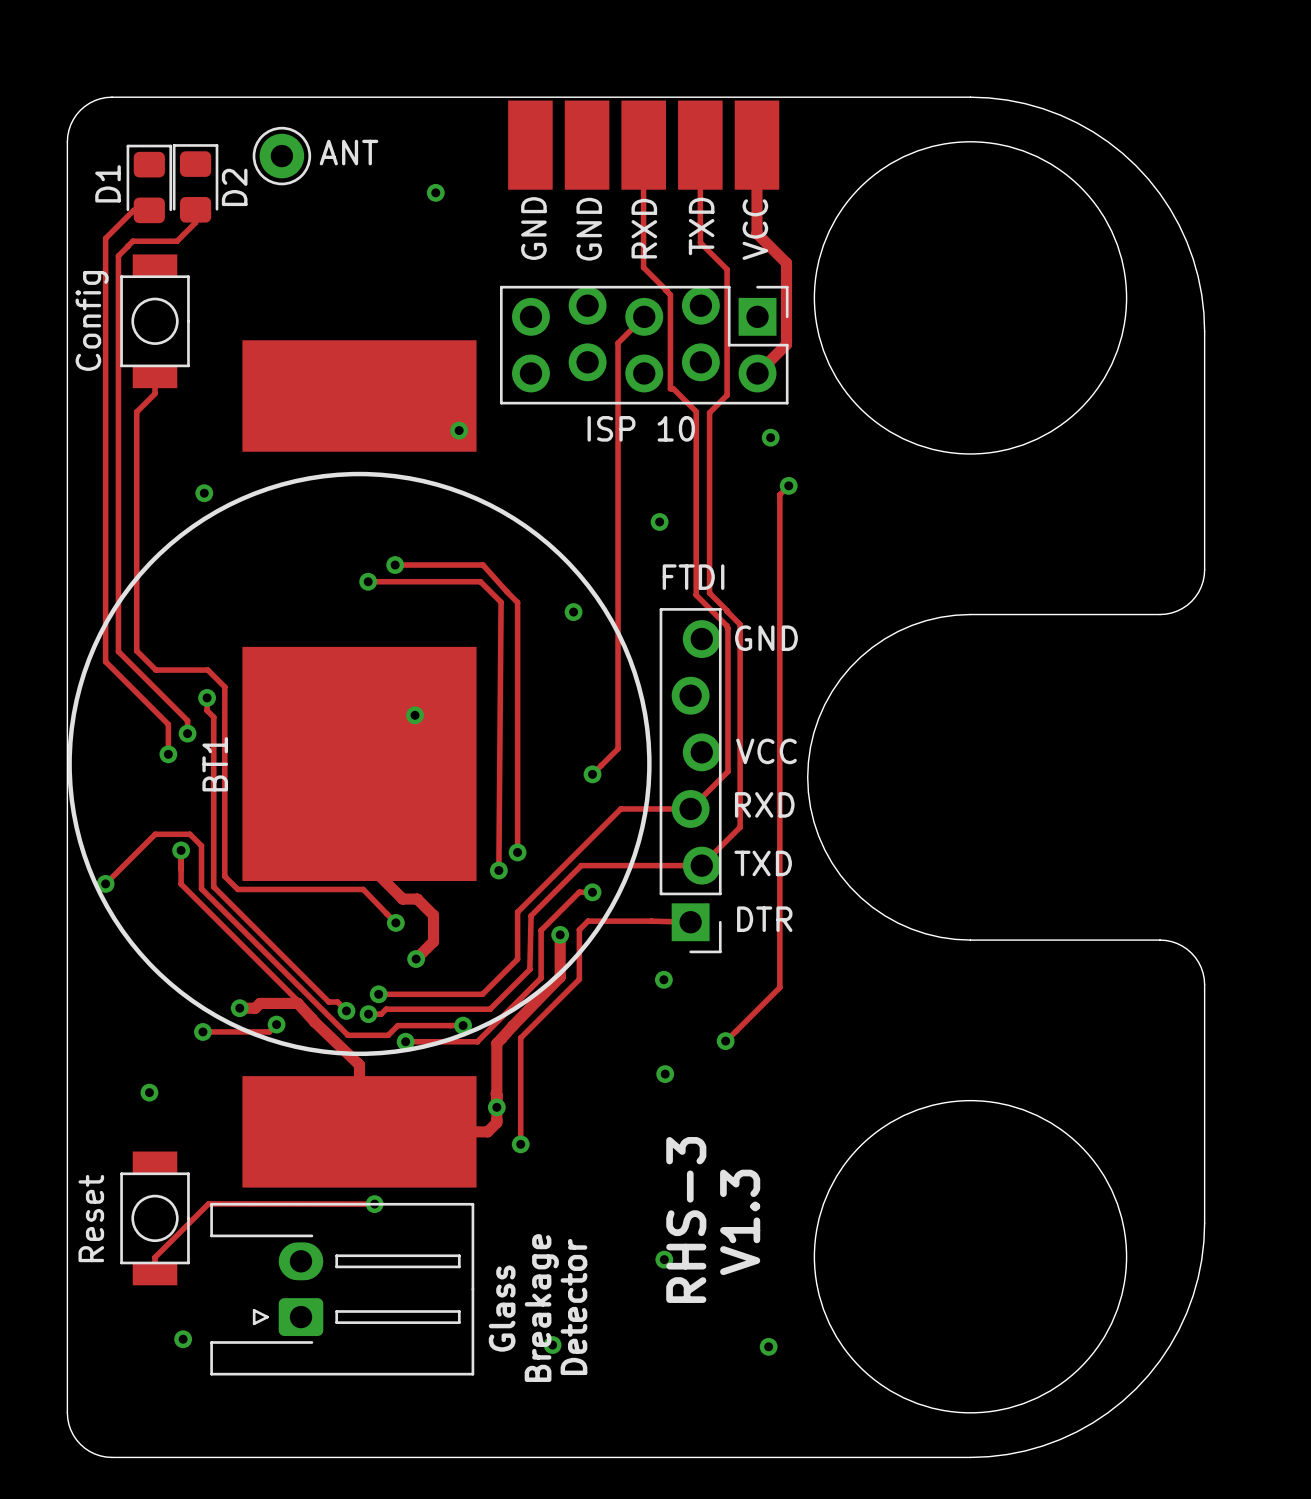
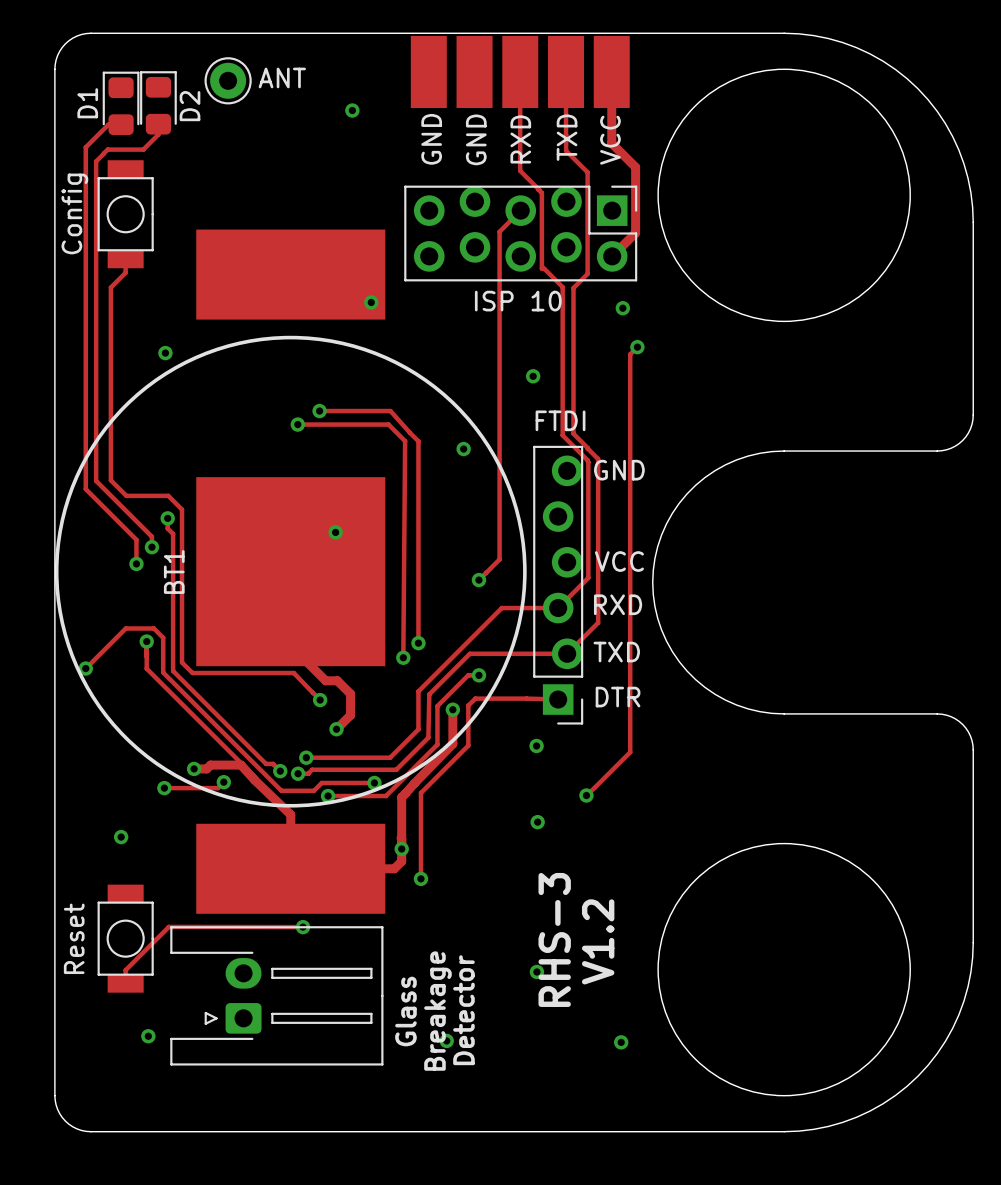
text: V1.3 (740, 1222) -> V1.2 (598, 941)

